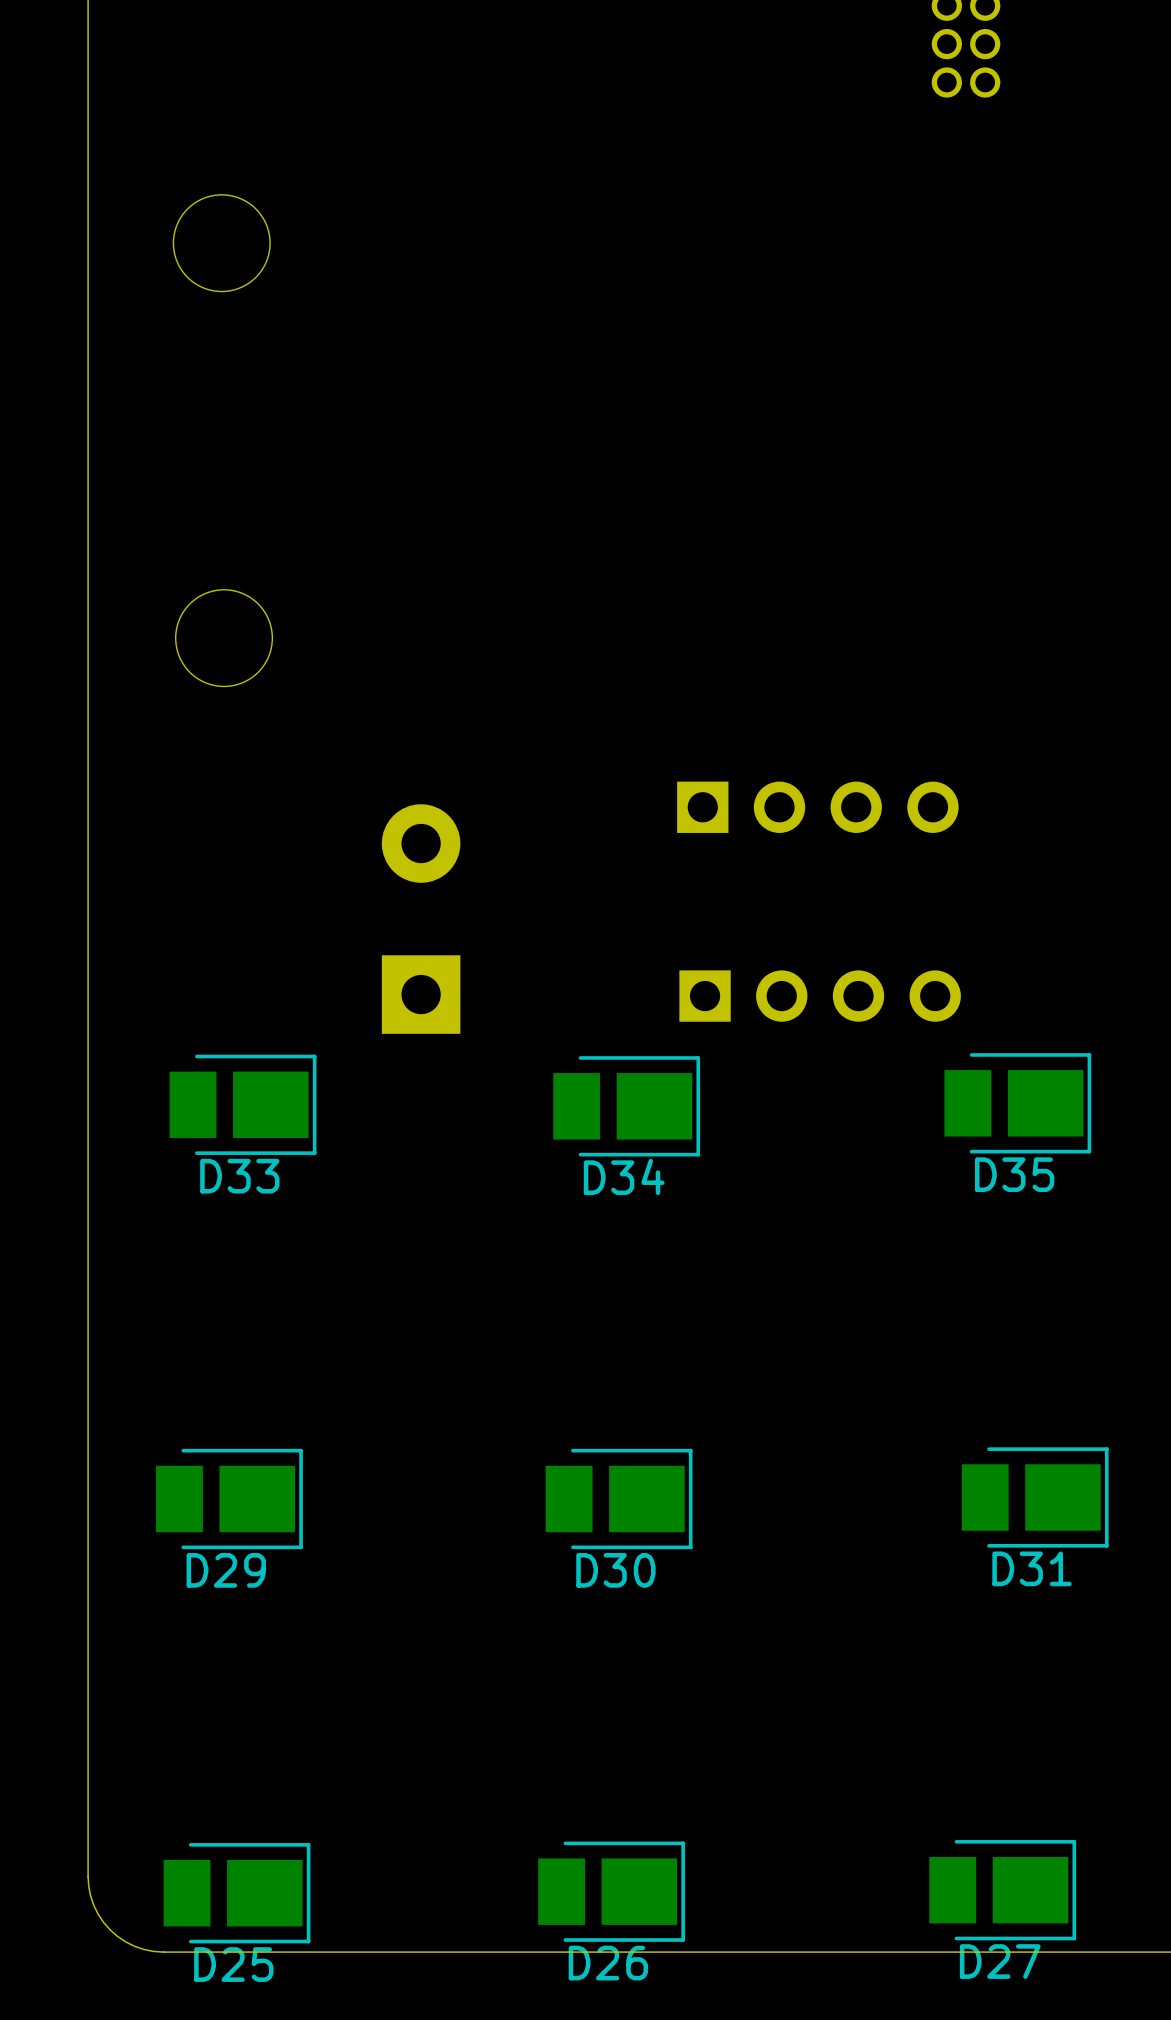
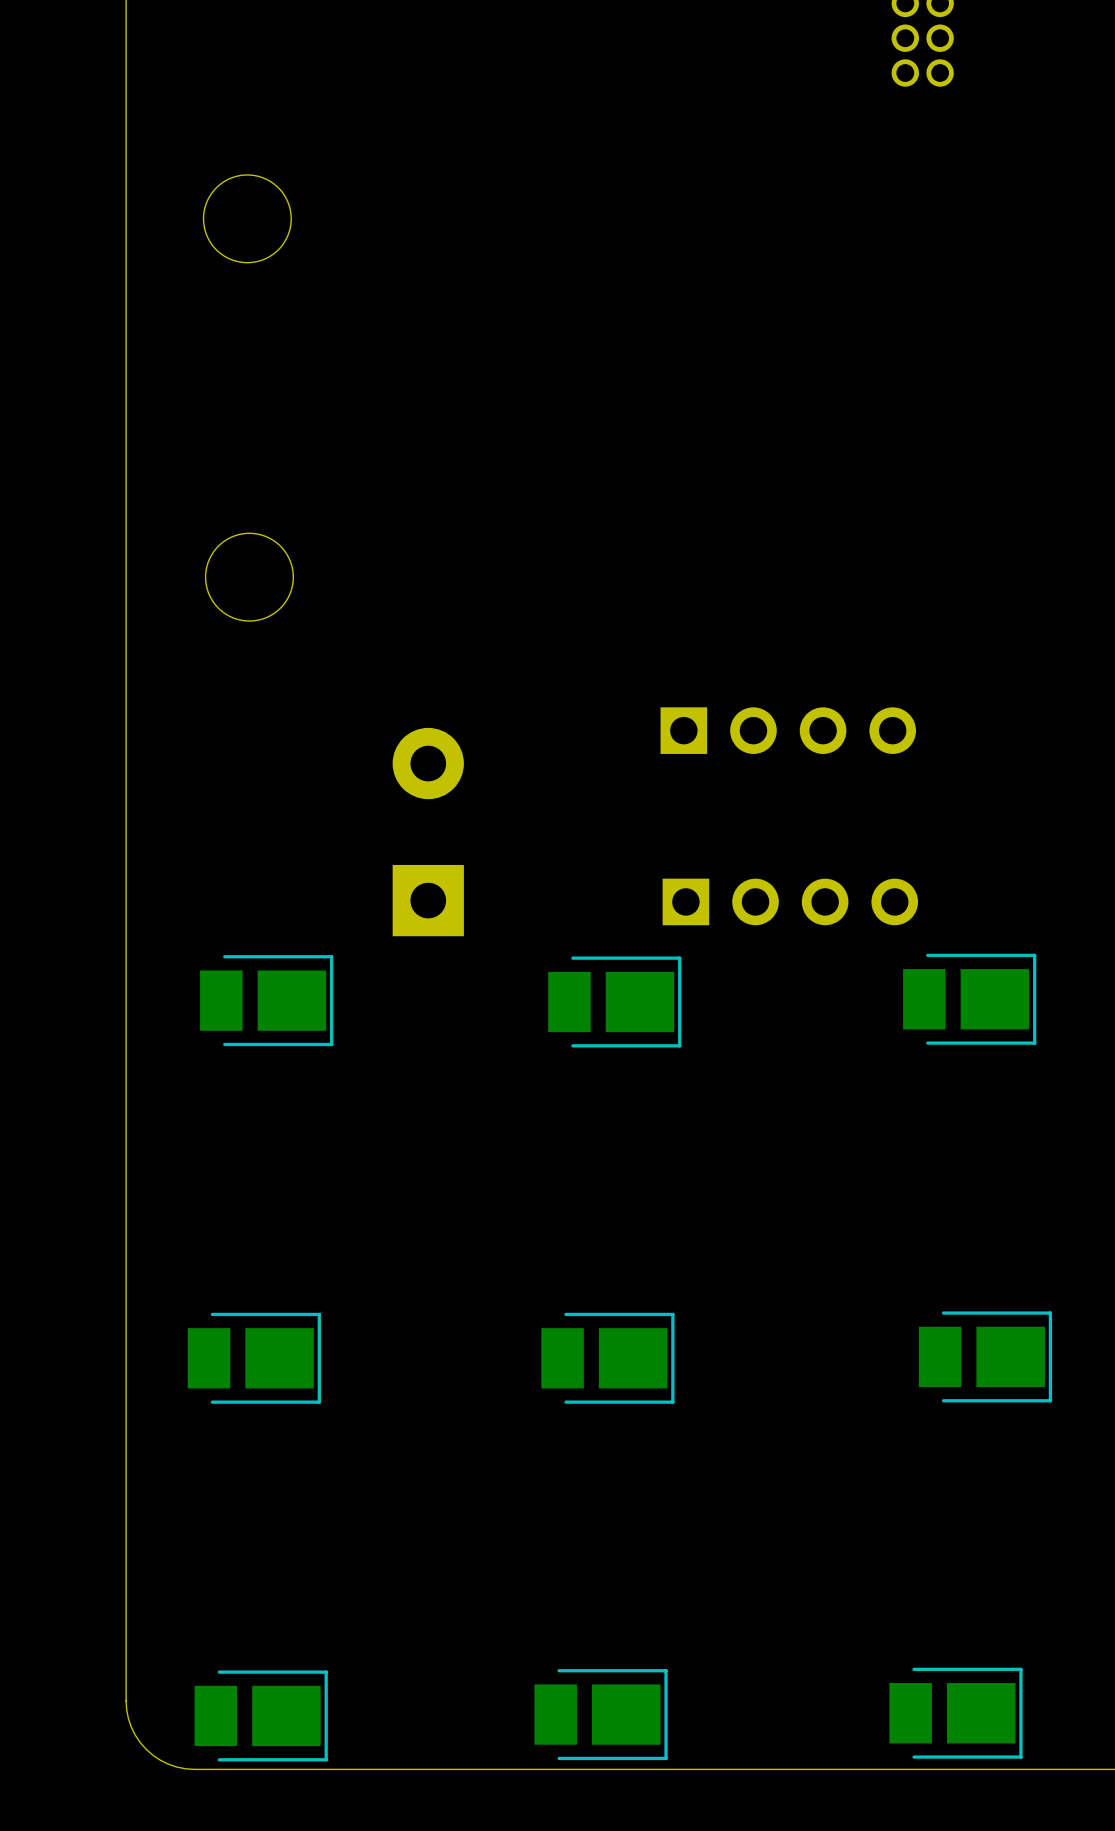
D35 name: D35 (1014, 1174) -> none
D33 name: D33 (239, 1176) -> none
D34 name: D34 (624, 1176) -> none
D31 name: D31 (1031, 1568) -> none
D29 name: D29 (226, 1570) -> none
D30 name: D30 (615, 1570) -> none
D27 name: D27 (1000, 1961) -> none
D26 name: D26 (608, 1963) -> none
D25 name: D25 (233, 1964) -> none

